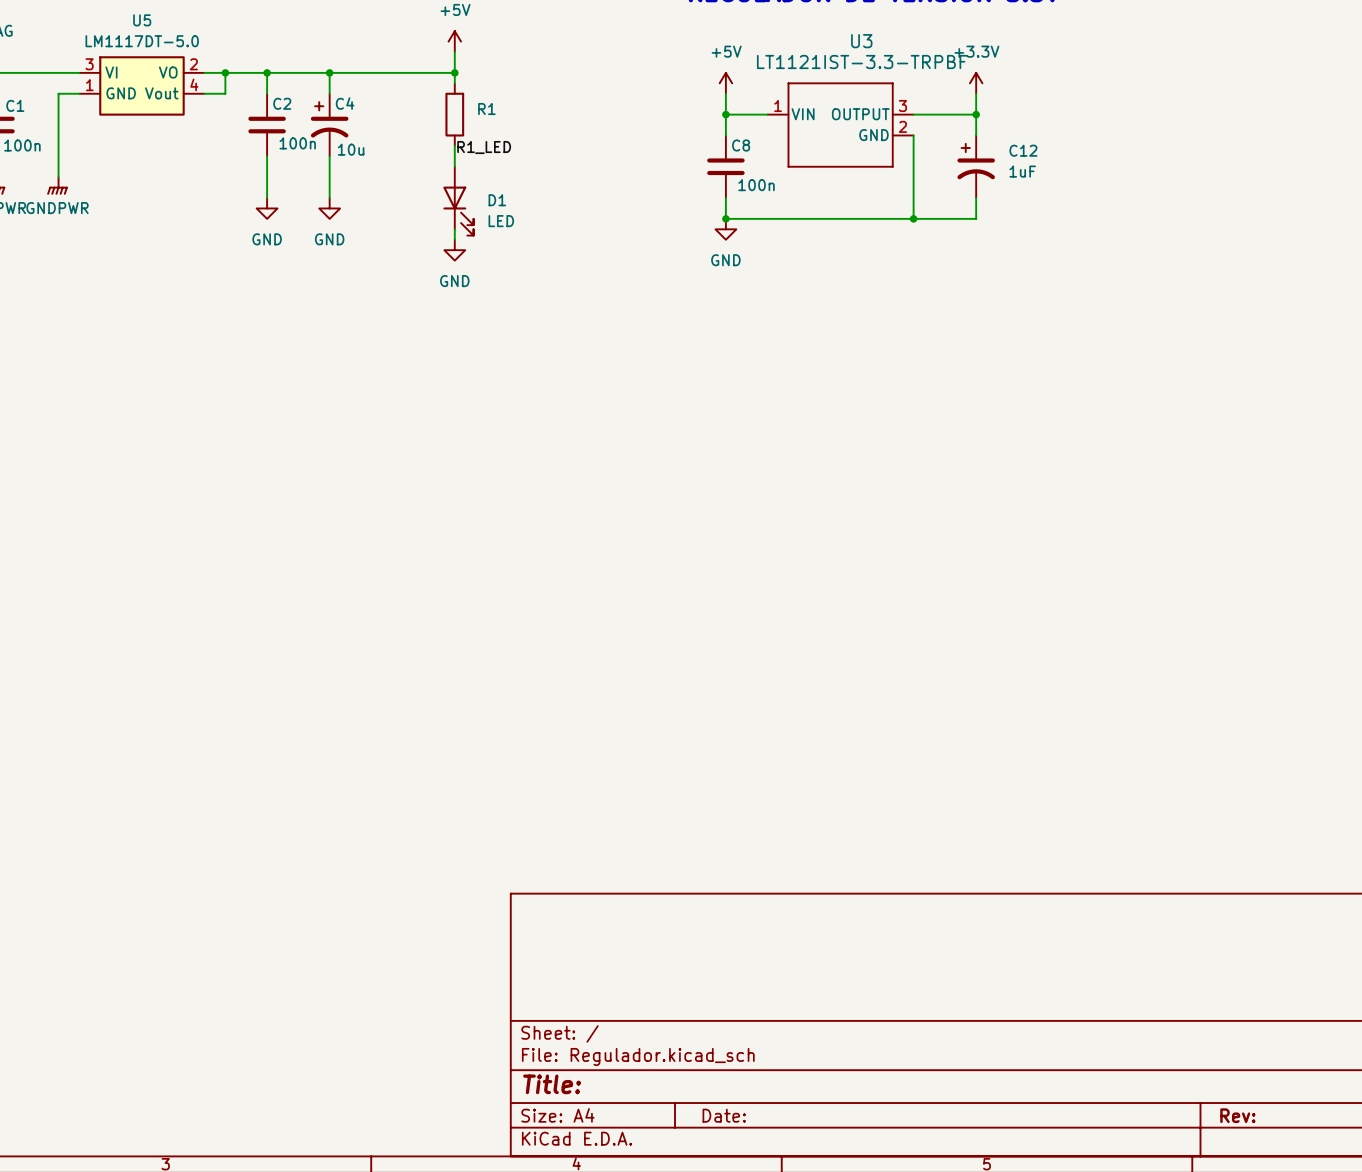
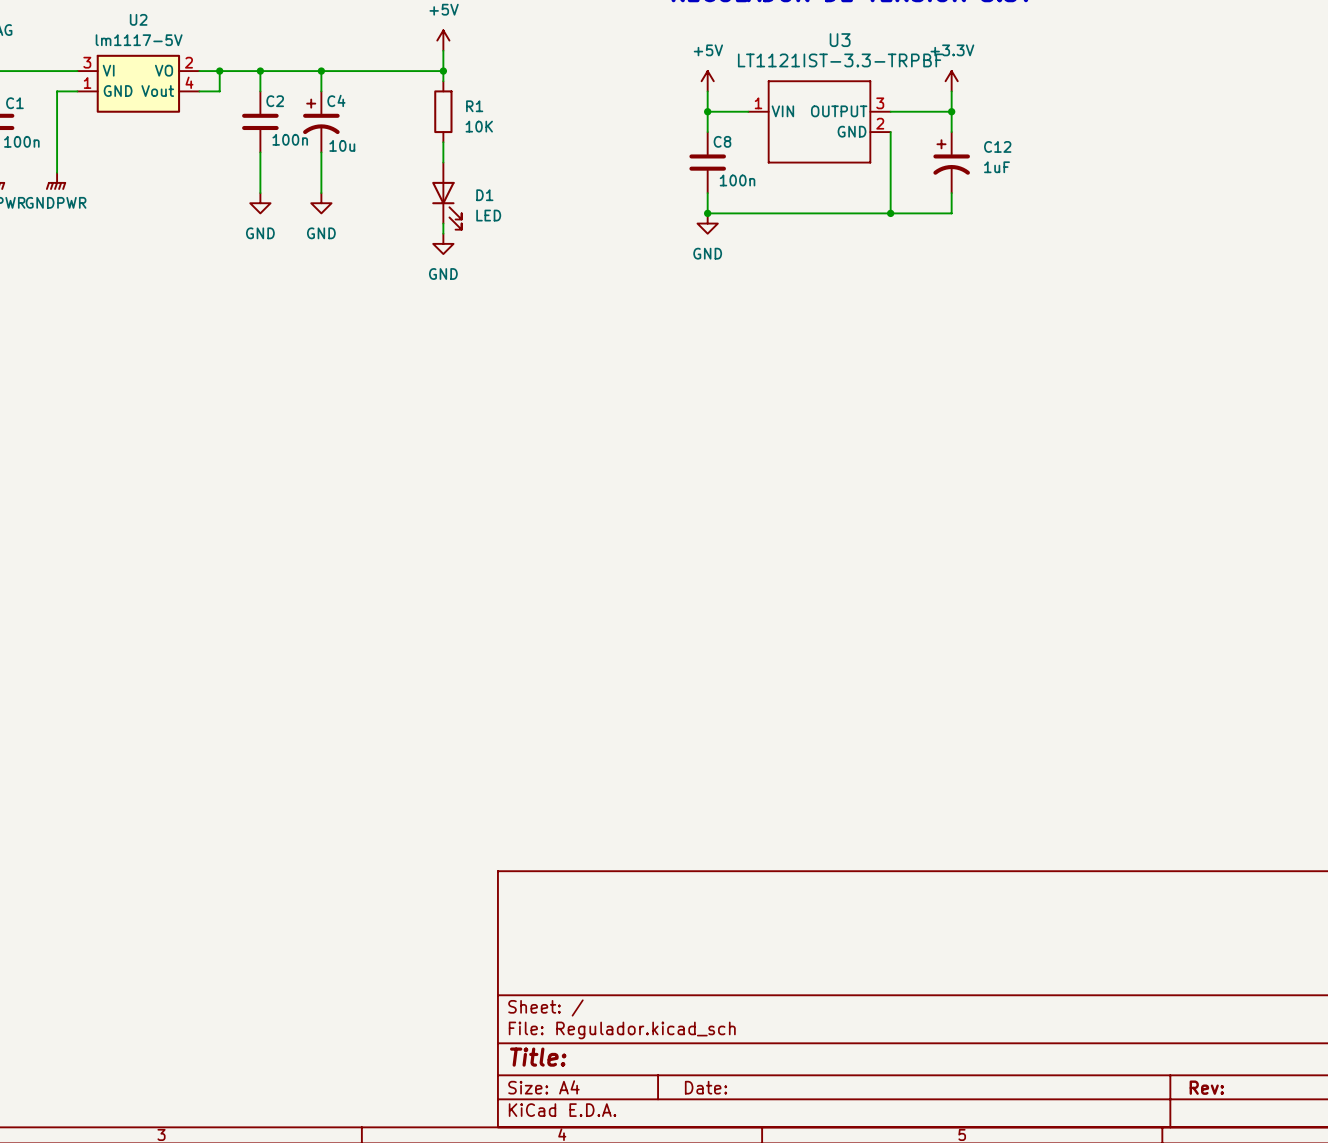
U5 name: U5 (142, 20) -> U2 (138, 19)
U5 value: LM1117DT-5.0 (142, 41) -> lm1117-5V (139, 40)
R1 value: none -> 10K (479, 126)
label: R1_LED (484, 147) -> none

